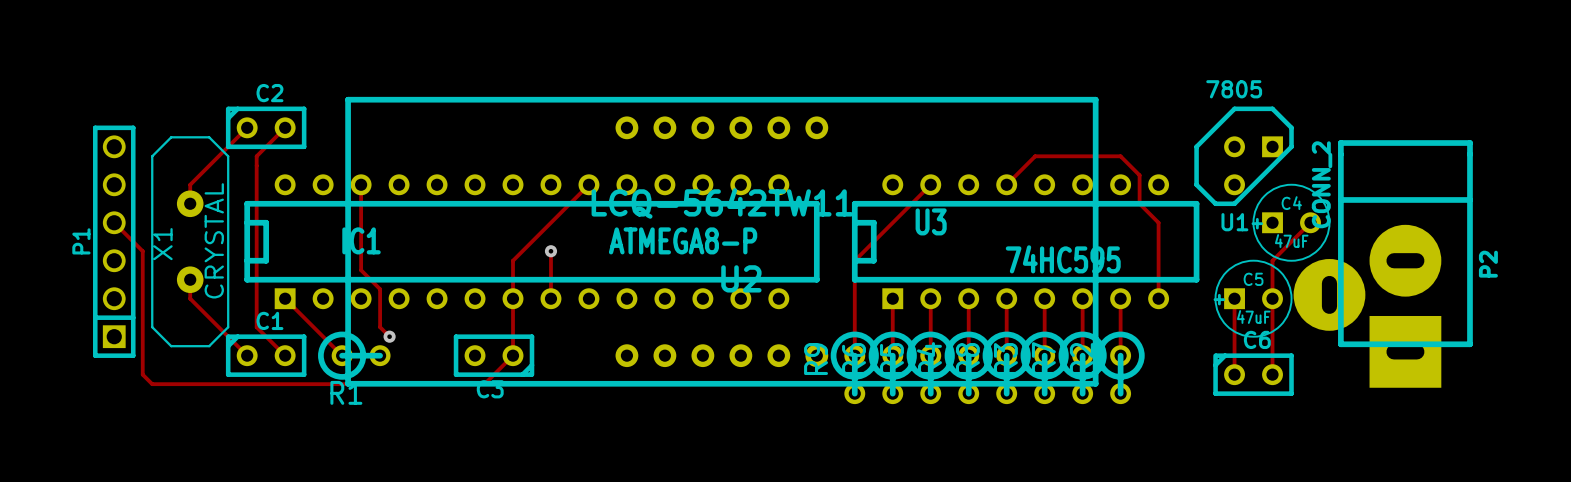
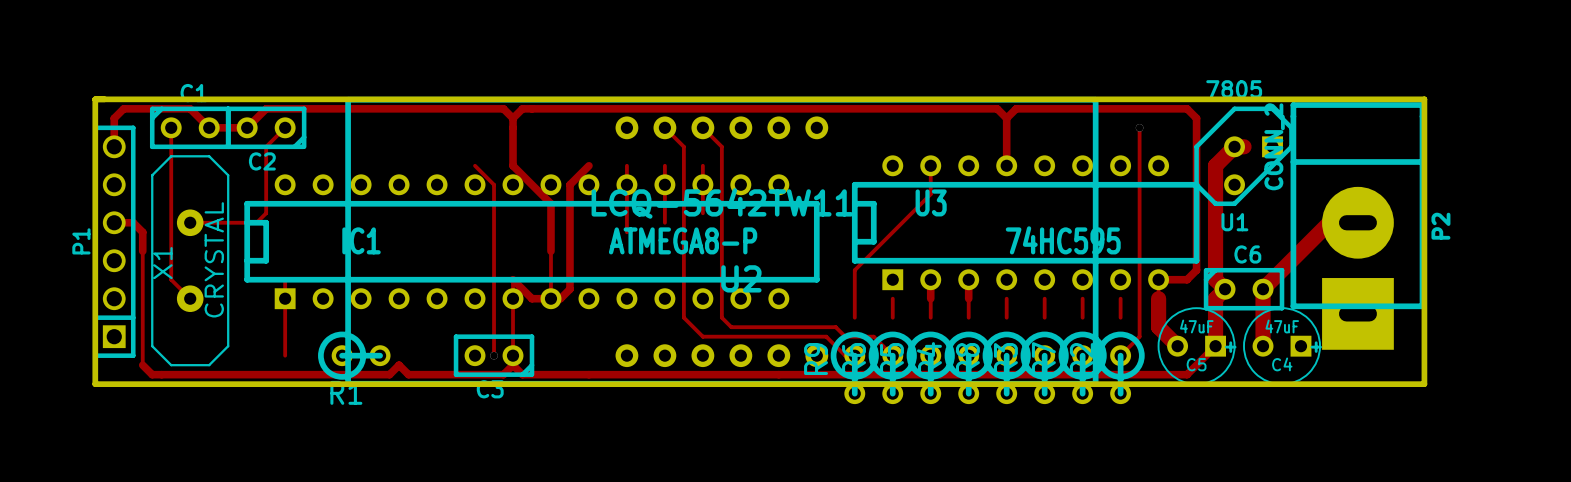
board edge: none -> (95, 99) (1424, 99) (1424, 384) (95, 384) (95, 99)
track: none -> (513, 118) (503, 108) (266, 108) (247, 127) (209, 127) (190, 108) (123, 108) (114, 118) (114, 146)
track: none -> (513, 118) (513, 165) (550, 203) (550, 251)
track: none -> (513, 118) (522, 108) (997, 108) (1006, 118)
track: none -> (1006, 118) (1006, 165)
track: none -> (1006, 118) (1016, 108) (1187, 108) (1196, 118) (1196, 270) (1187, 279) (1158, 279)
track: none -> (171, 127) (171, 279) (190, 298)
track: (247, 127) (190, 184) (190, 203) -> none
C2 rotation: 0° (266, 127) -> 180° (266, 127)
via: none -> (1139, 127)
P2 footprint: [1293, 140, 1473, 388] -> [1290, 102, 1426, 350]
track: (266, 146) (256, 156) (256, 327) (285, 355) -> (285, 279) (285, 355)
track: none -> (266, 146) (266, 213) (256, 222) (190, 222)
track: none -> (1244, 146) (1234, 146) (1215, 165) (1215, 279) (1225, 289) (1215, 298) (1215, 346) (1187, 374) (522, 374) (513, 365)
track: none -> (475, 165) (494, 184) (494, 355)
track: none -> (626, 165) (626, 232)
track: none -> (664, 165) (664, 222)
track: none -> (702, 165) (702, 213)
track: (1139, 175) (1120, 156) (1035, 156) (1006, 184) -> (1139, 175) (1139, 127)
track: (361, 184) (361, 270) (380, 289) (380, 327) (389, 336) -> none
track: (588, 184) (513, 260) (513, 279) -> (588, 165) (569, 184) (569, 289) (560, 298) (531, 298) (513, 279)
track: (930, 184) (854, 260) (854, 270) -> (930, 165) (930, 194) (854, 270)
track: (1139, 203) (1158, 222) (1158, 279) -> (1139, 203) (1139, 336) (1120, 355)
track: (114, 222) (142, 251) -> (114, 222) (133, 222) (142, 232) (142, 251)
C4 rotation: 0° (1291, 222) -> 180° (1282, 346)
C4 position: (1291, 222) -> (1282, 346)
track: (1310, 222) (1272, 260) (1272, 374) -> none
track: none -> (1357, 222) (1329, 222) (1263, 289) (1263, 346)
X1 position: (190, 241) -> (190, 260)
U3 position: (1025, 241) -> (1025, 222)
via: (550, 251) -> none
track: (190, 279) (190, 298) (247, 355) -> none
track: none -> (930, 279) (930, 298)
track: none -> (968, 279) (968, 298)
track: (285, 298) (342, 355) -> none
track: none -> (1158, 298) (1158, 327) (1177, 346)
track: (1234, 298) (1234, 374) -> none
C5 rotation: 0° (1253, 298) -> 180° (1196, 346)
C5 position: (1253, 298) -> (1196, 346)
track: (854, 317) (854, 355) -> (664, 127) (683, 146) (683, 317) (702, 336) (826, 336) (845, 355) (854, 355)
track: (892, 317) (892, 355) -> (702, 127) (721, 146) (721, 317) (731, 327) (835, 327) (845, 336) (873, 336) (892, 355)
track: (930, 317) (930, 355) -> none
track: (968, 317) (968, 355) -> none
track: (1006, 317) (1006, 355) -> none
track: (1044, 317) (1044, 355) -> none
track: (1082, 317) (1082, 355) -> none
track: (1120, 317) (1120, 355) -> none
via: (389, 336) -> none
C1 position: (266, 355) -> (190, 127)
via: none -> (494, 355)
track: (513, 355) (484, 384) (152, 384) (142, 374) (142, 365) -> (513, 365) (503, 374) (408, 374) (399, 365) (389, 374) (152, 374) (142, 365)
C6 position: (1253, 374) -> (1244, 289)

